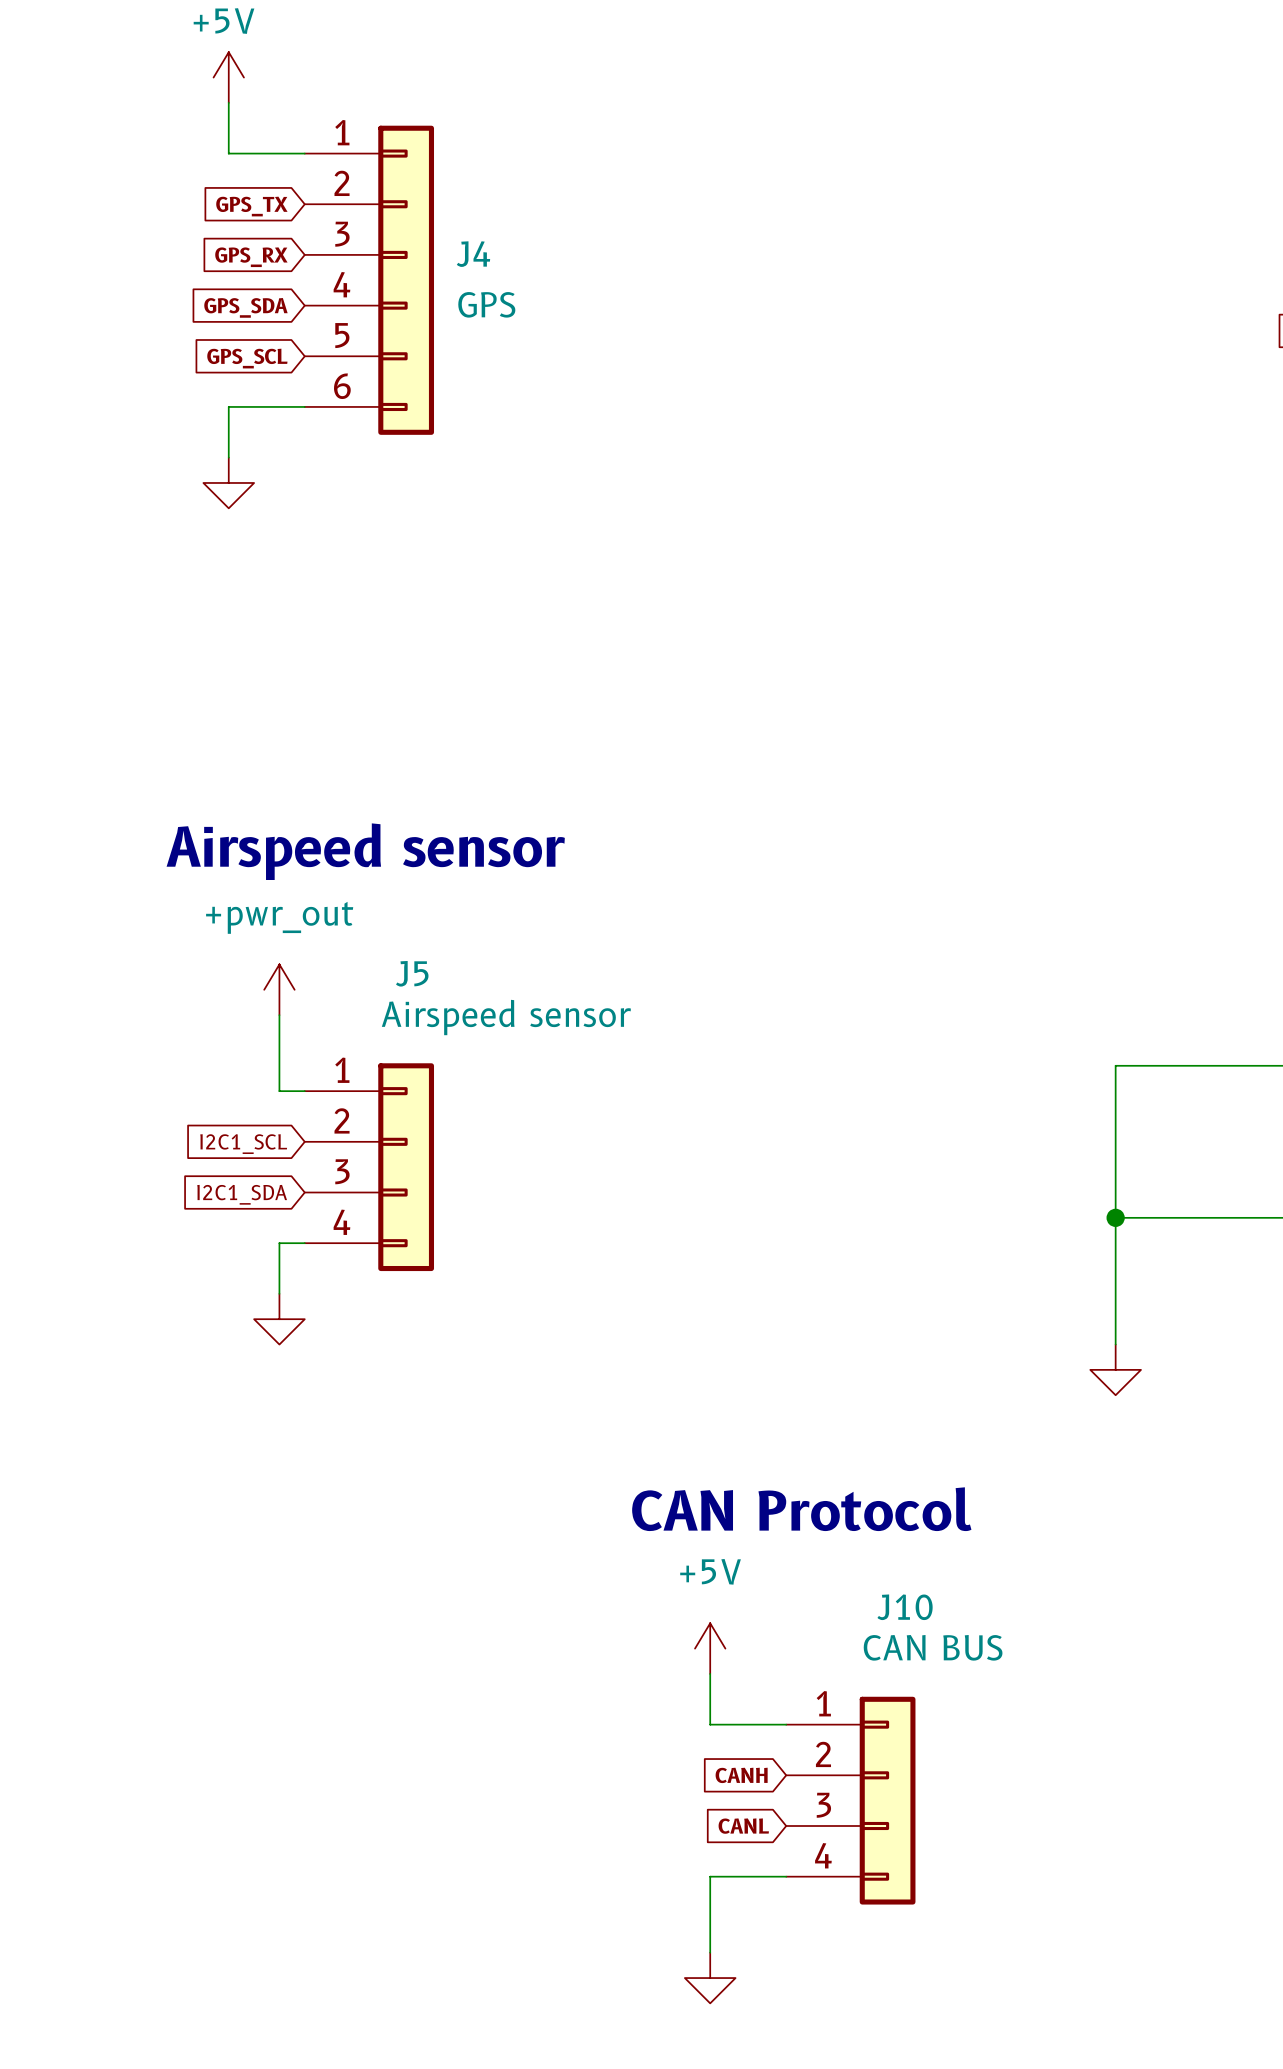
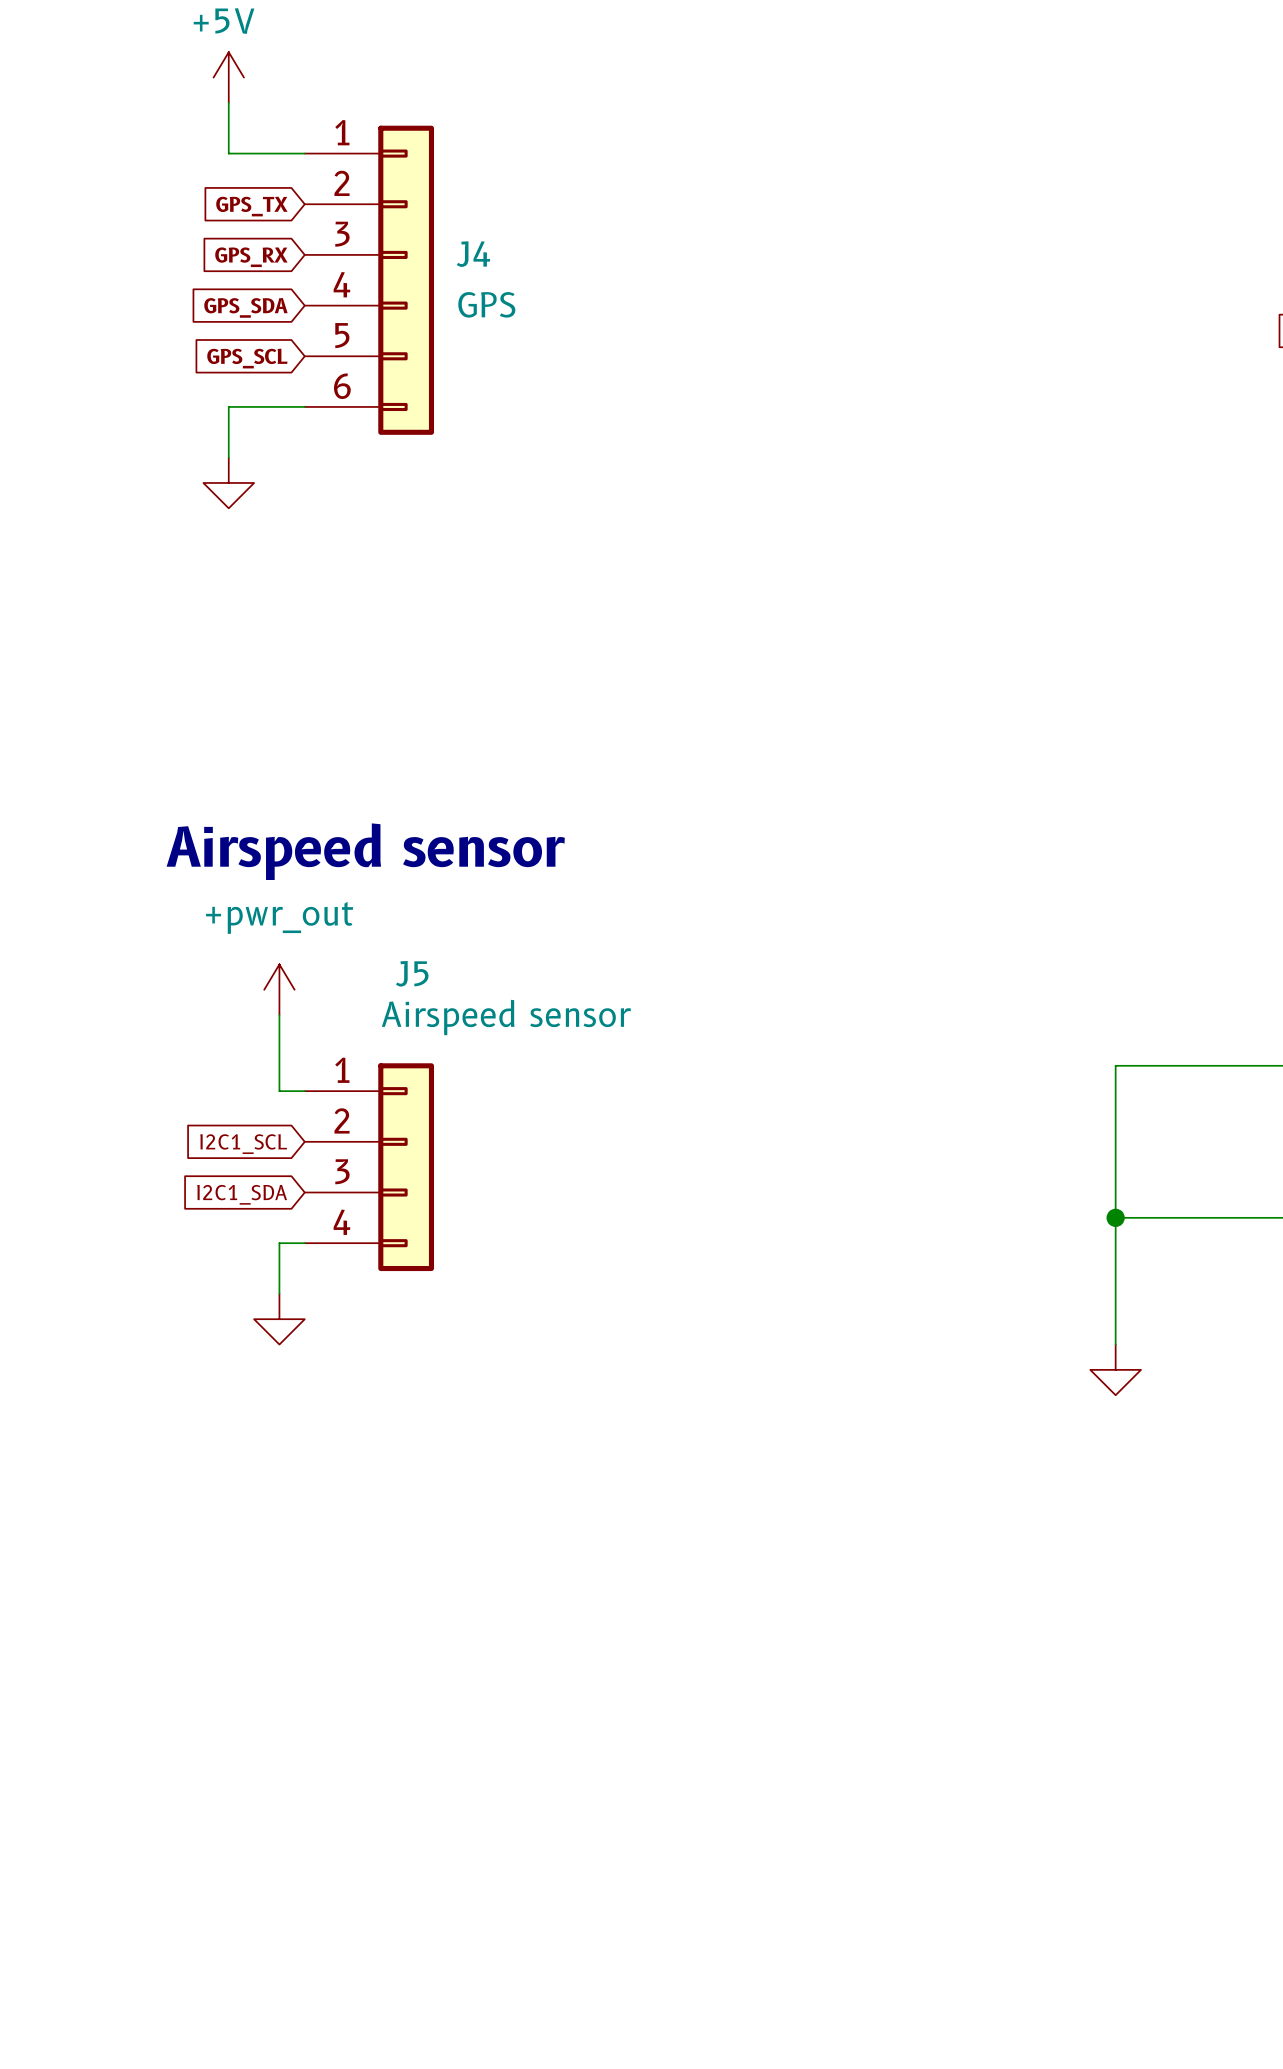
text: CAN Protocol (801, 1509) -> none
power symbol: +5V (710, 1648) -> none
wire: (710, 1673) (710, 1724) (786, 1724) -> none
global label: CANH (741, 1775) -> none
J10: CAN BUS (850, 1800) -> none
global label: CANL (743, 1826) -> none
wire: (786, 1876) (710, 1876) (710, 1952) -> none
power symbol: (710, 1978) -> none

